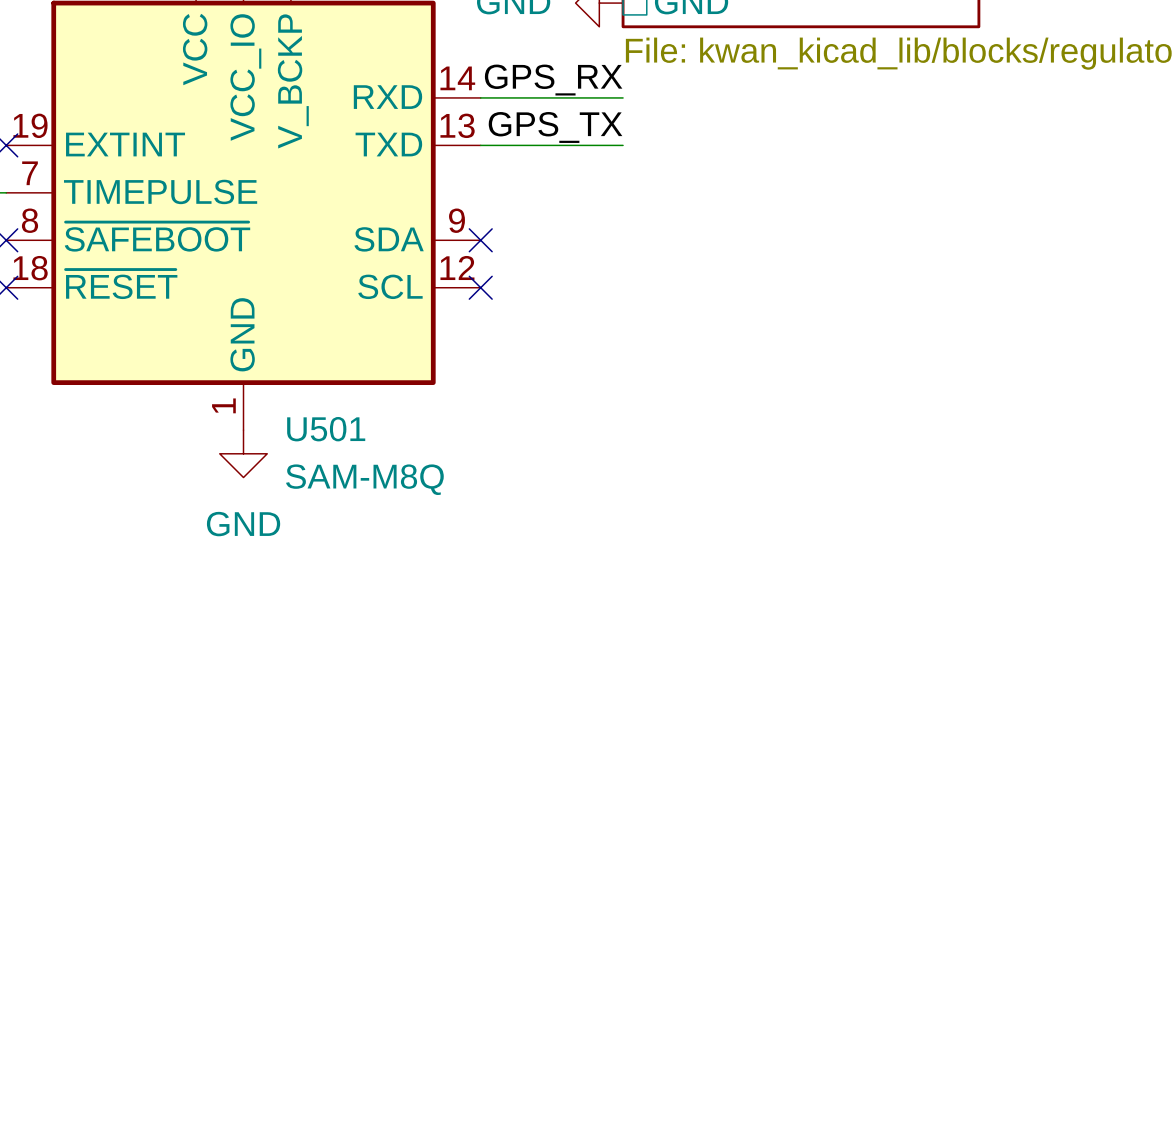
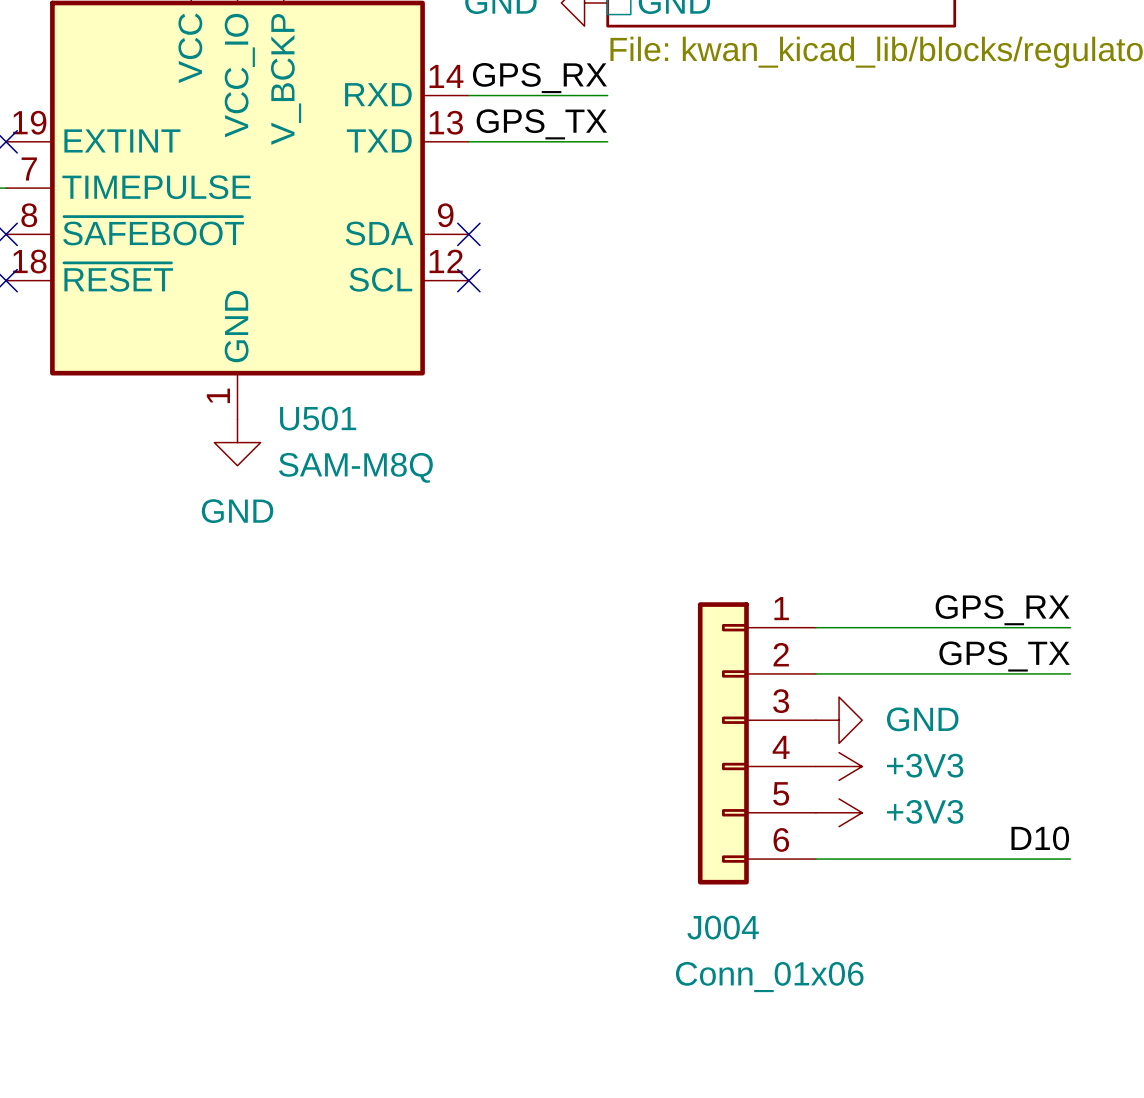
label: none -> GPS_RX (1002, 610)
wire: none -> (815, 627) (1070, 627)
label: none -> GPS_TX (1004, 656)
wire: none -> (815, 673) (1070, 673)
power symbol: none -> GND (839, 720)
J004: none -> Conn_01x06 (756, 743)
power symbol: none -> +3V3 (839, 766)
power symbol: none -> +3V3 (839, 812)
label: none -> D10 (1040, 838)
wire: none -> (815, 859) (1070, 859)

